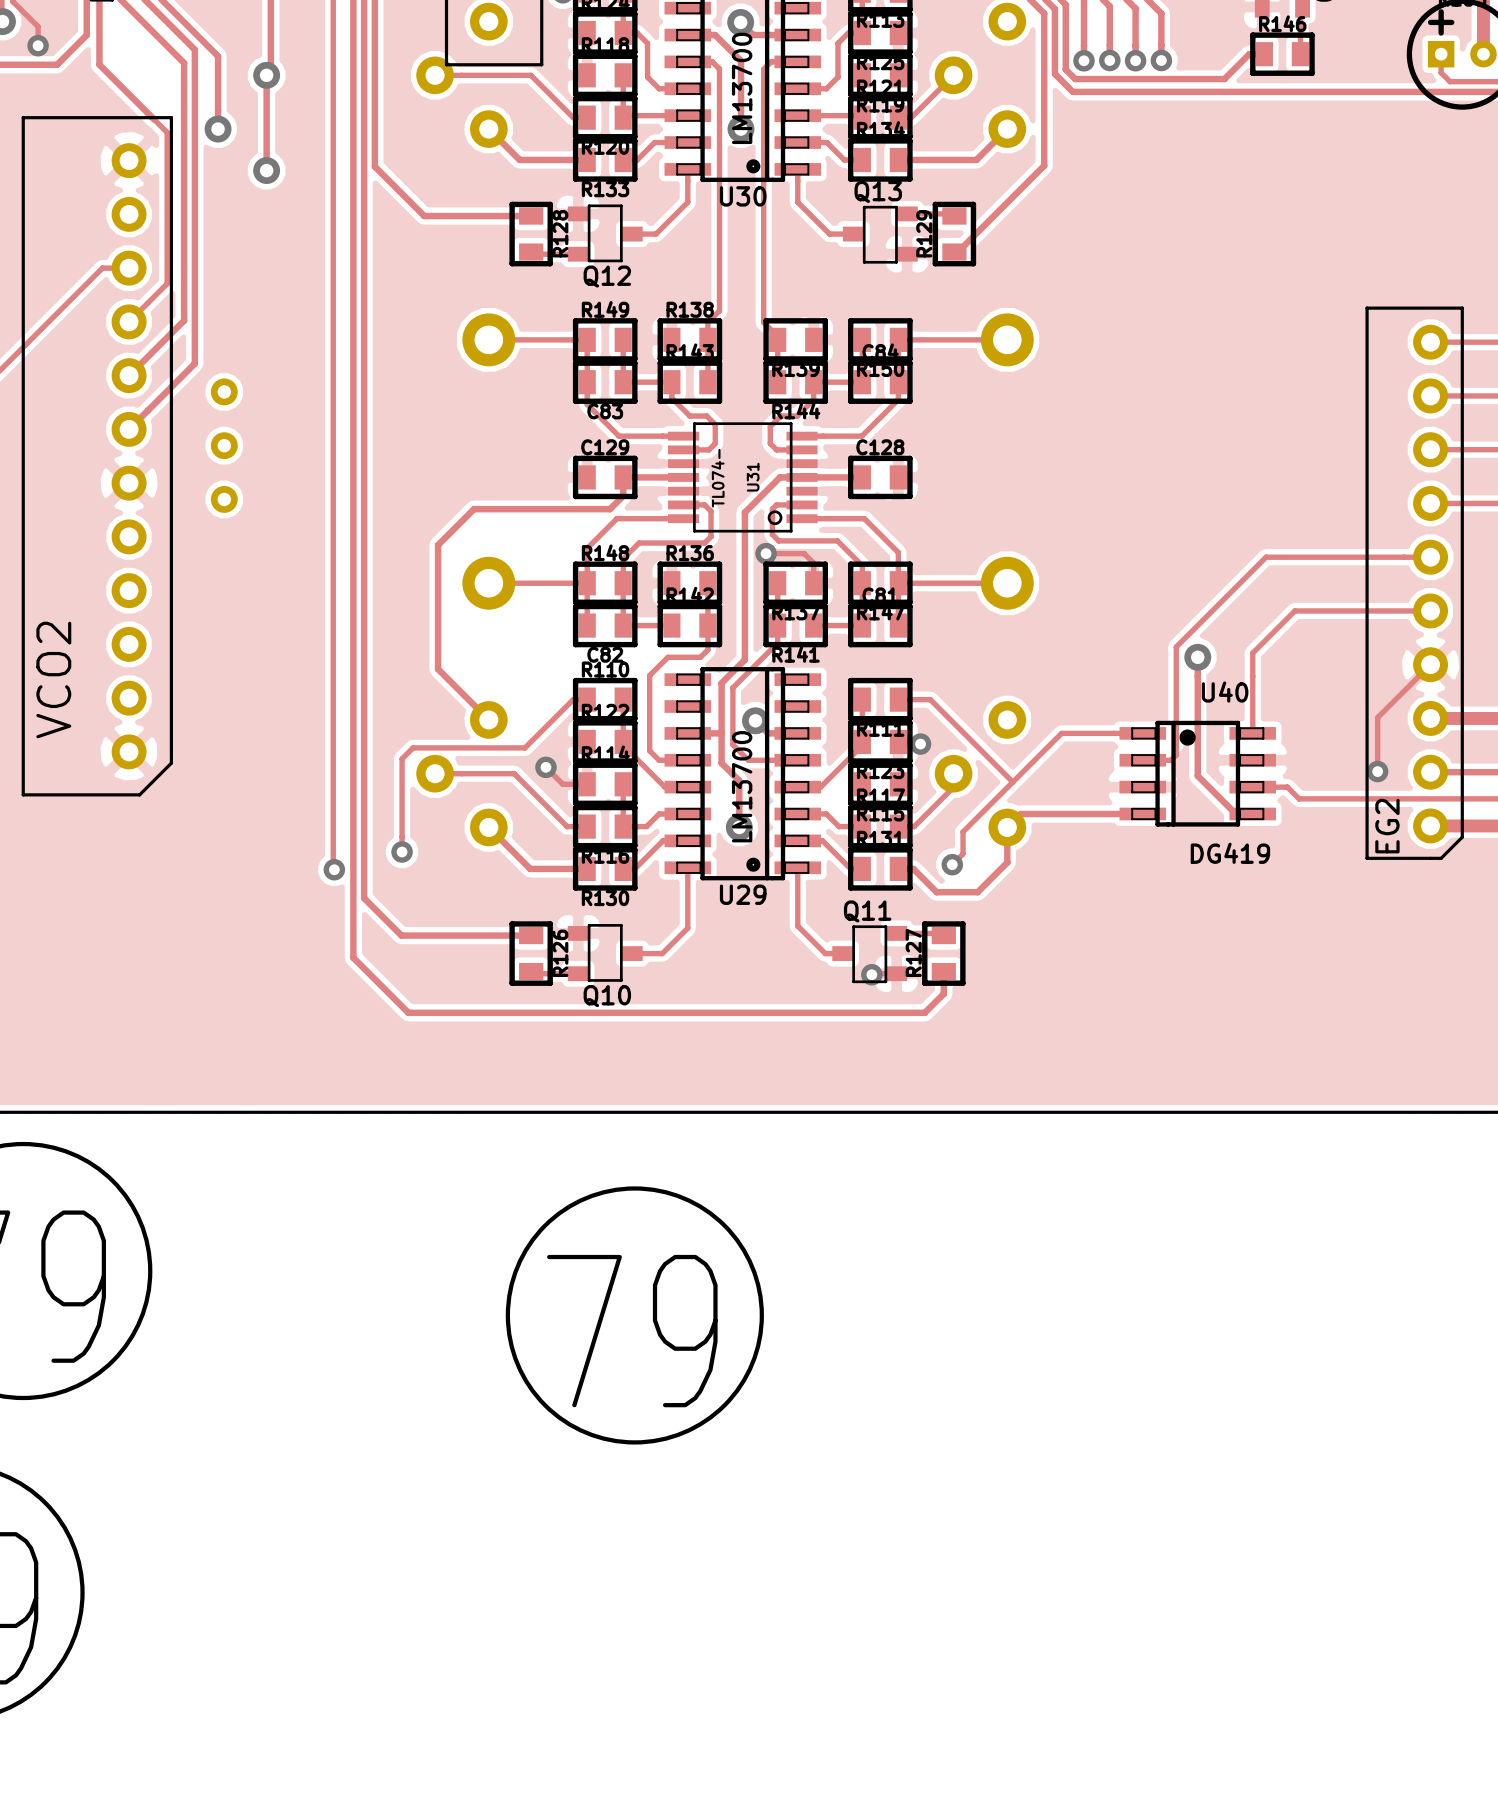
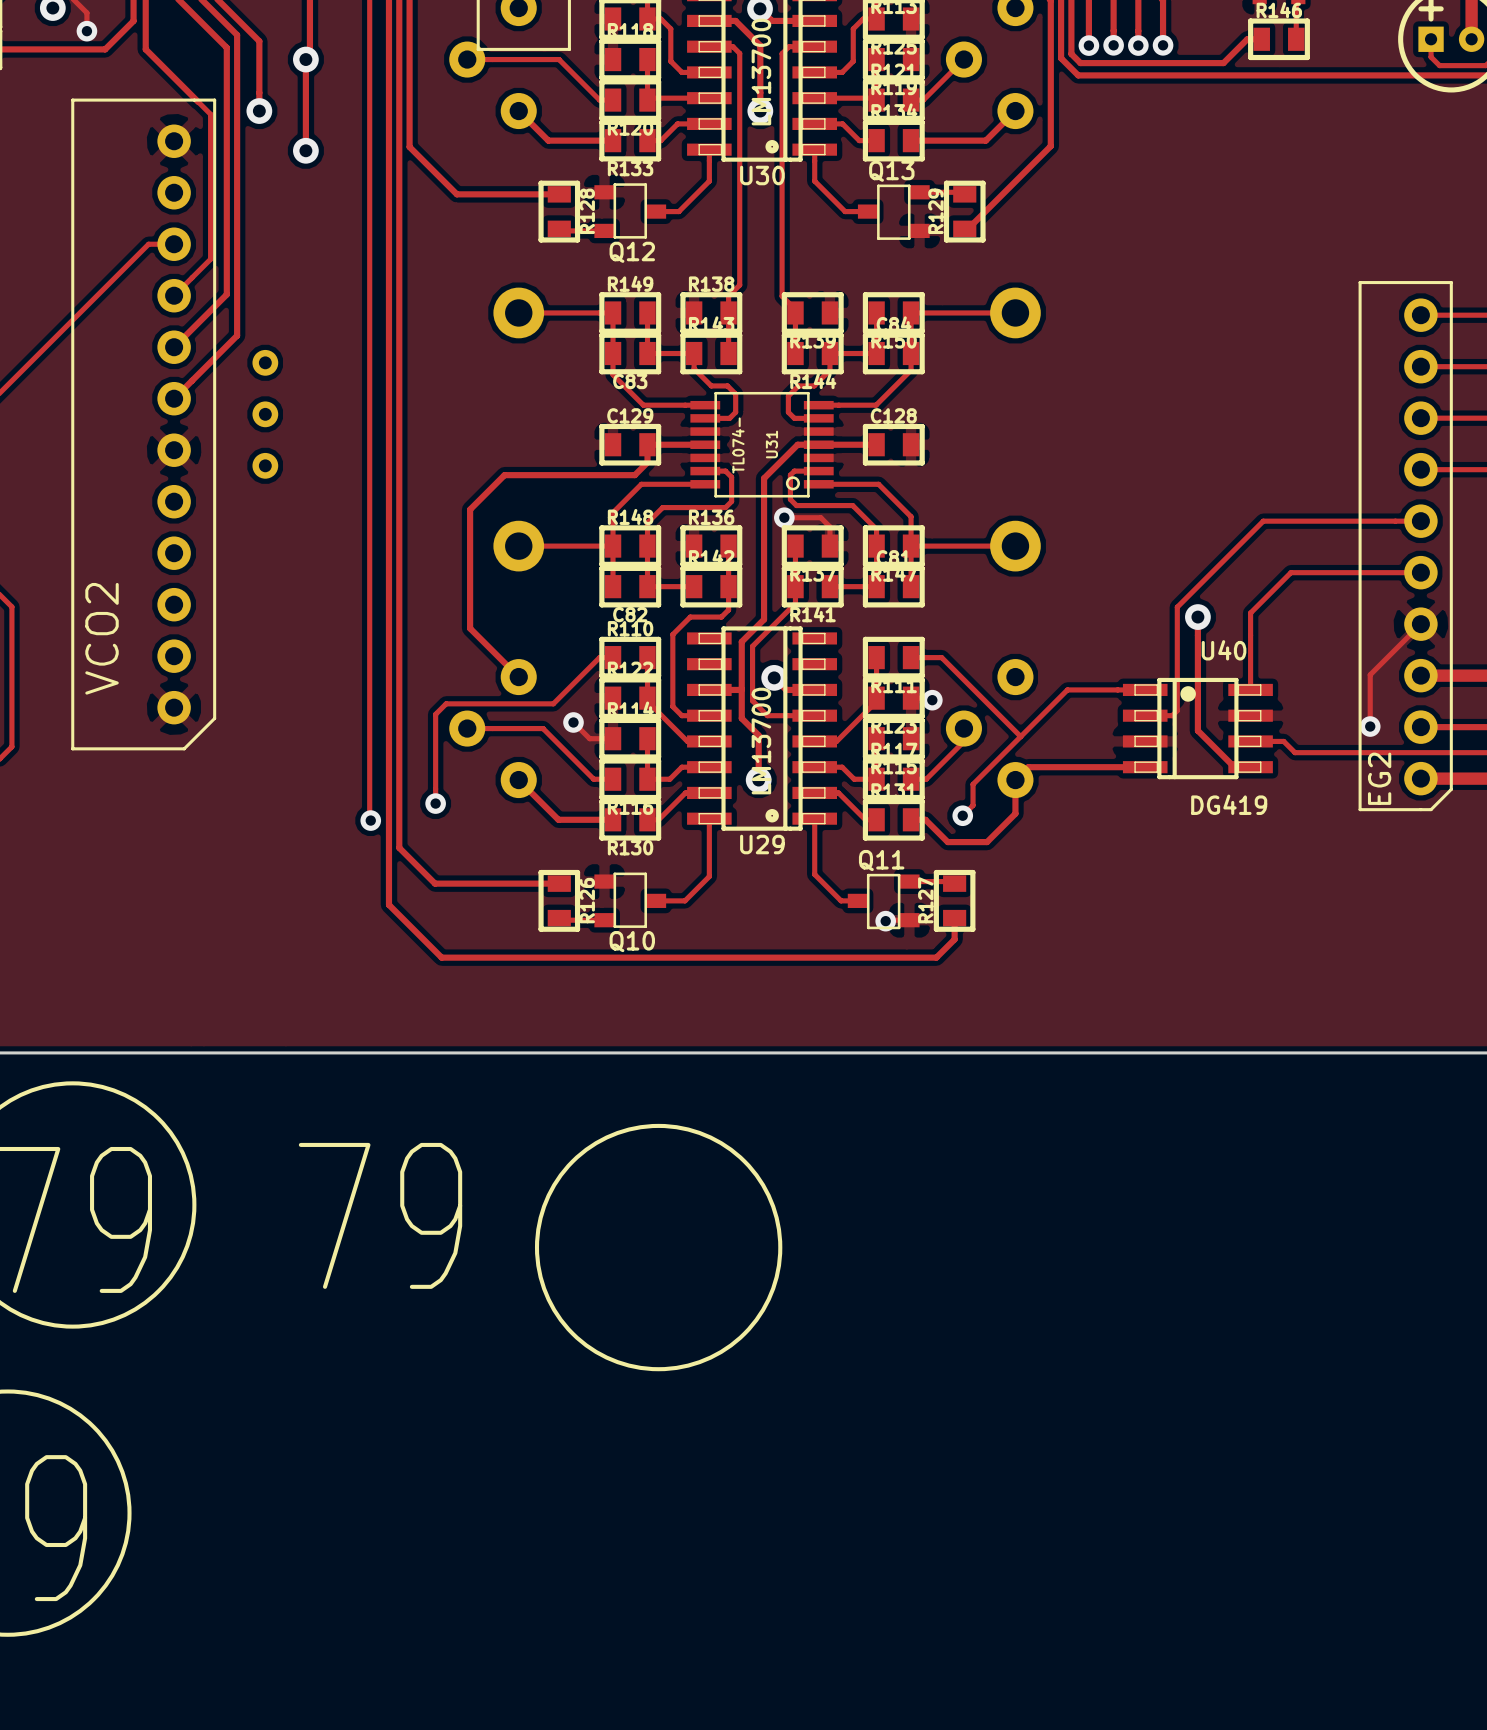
drawing shape: [505, 1186, 764, 1445] -> [298, 1123, 783, 1372]

